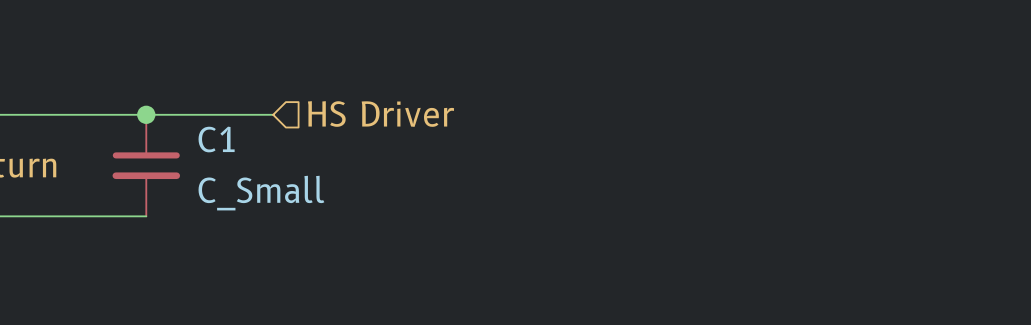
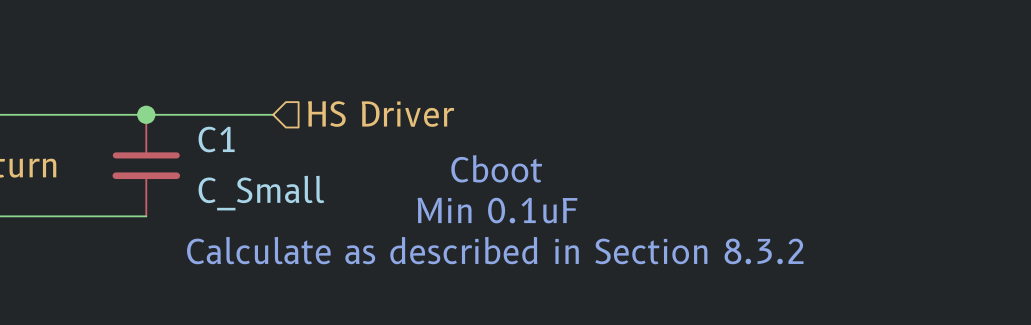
text: none -> Cboot (496, 168)
text: none -> Min 0.1uF (497, 210)
text: none -> Calculate as described in Section 8.3.2 (495, 250)

